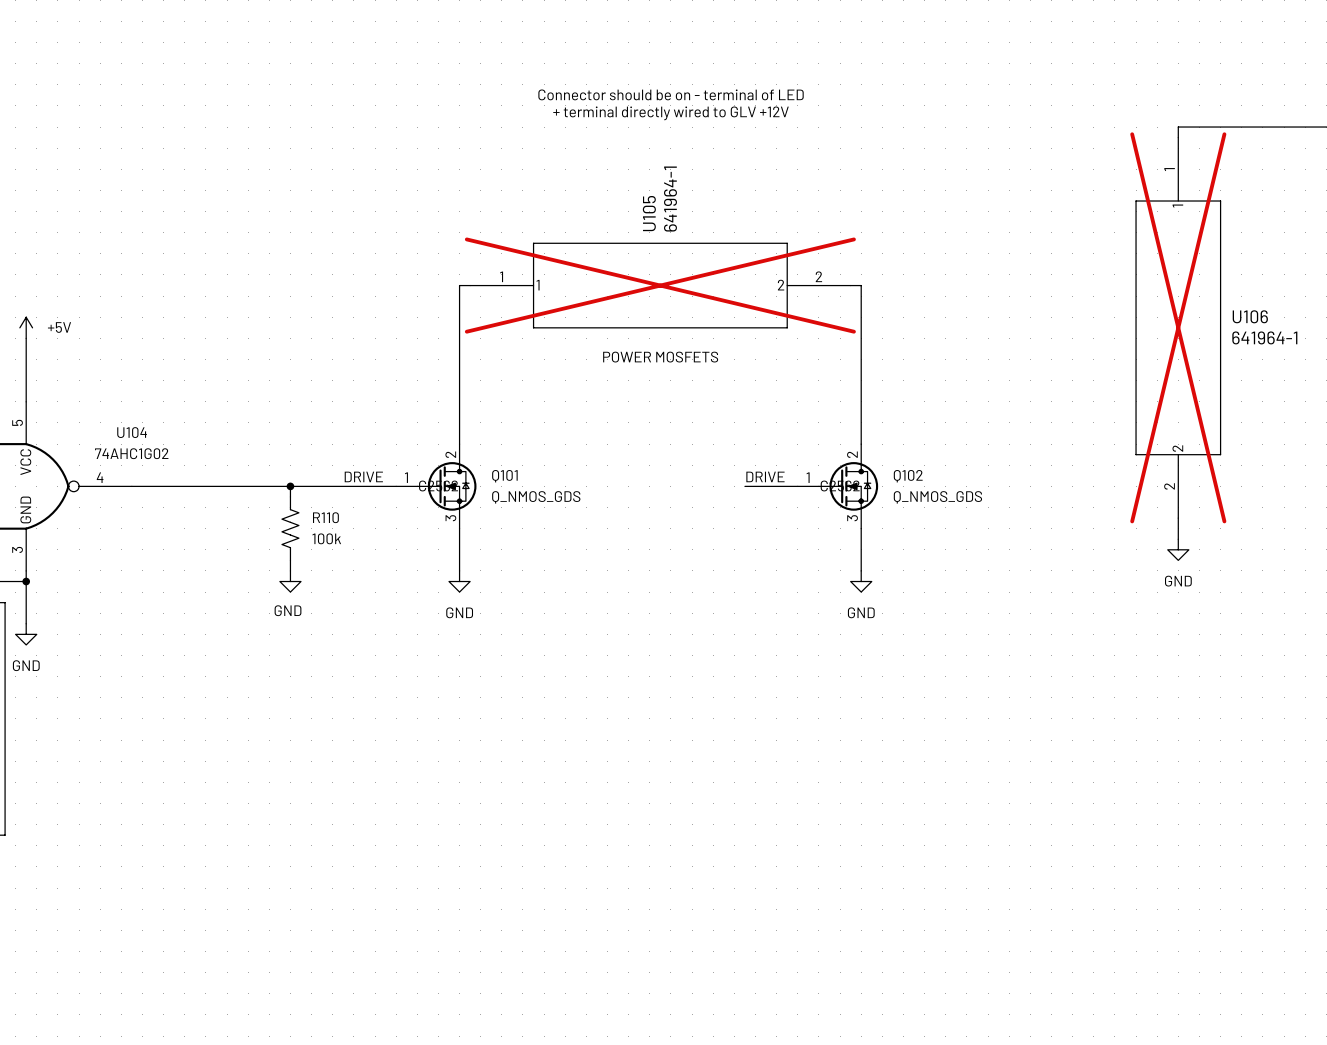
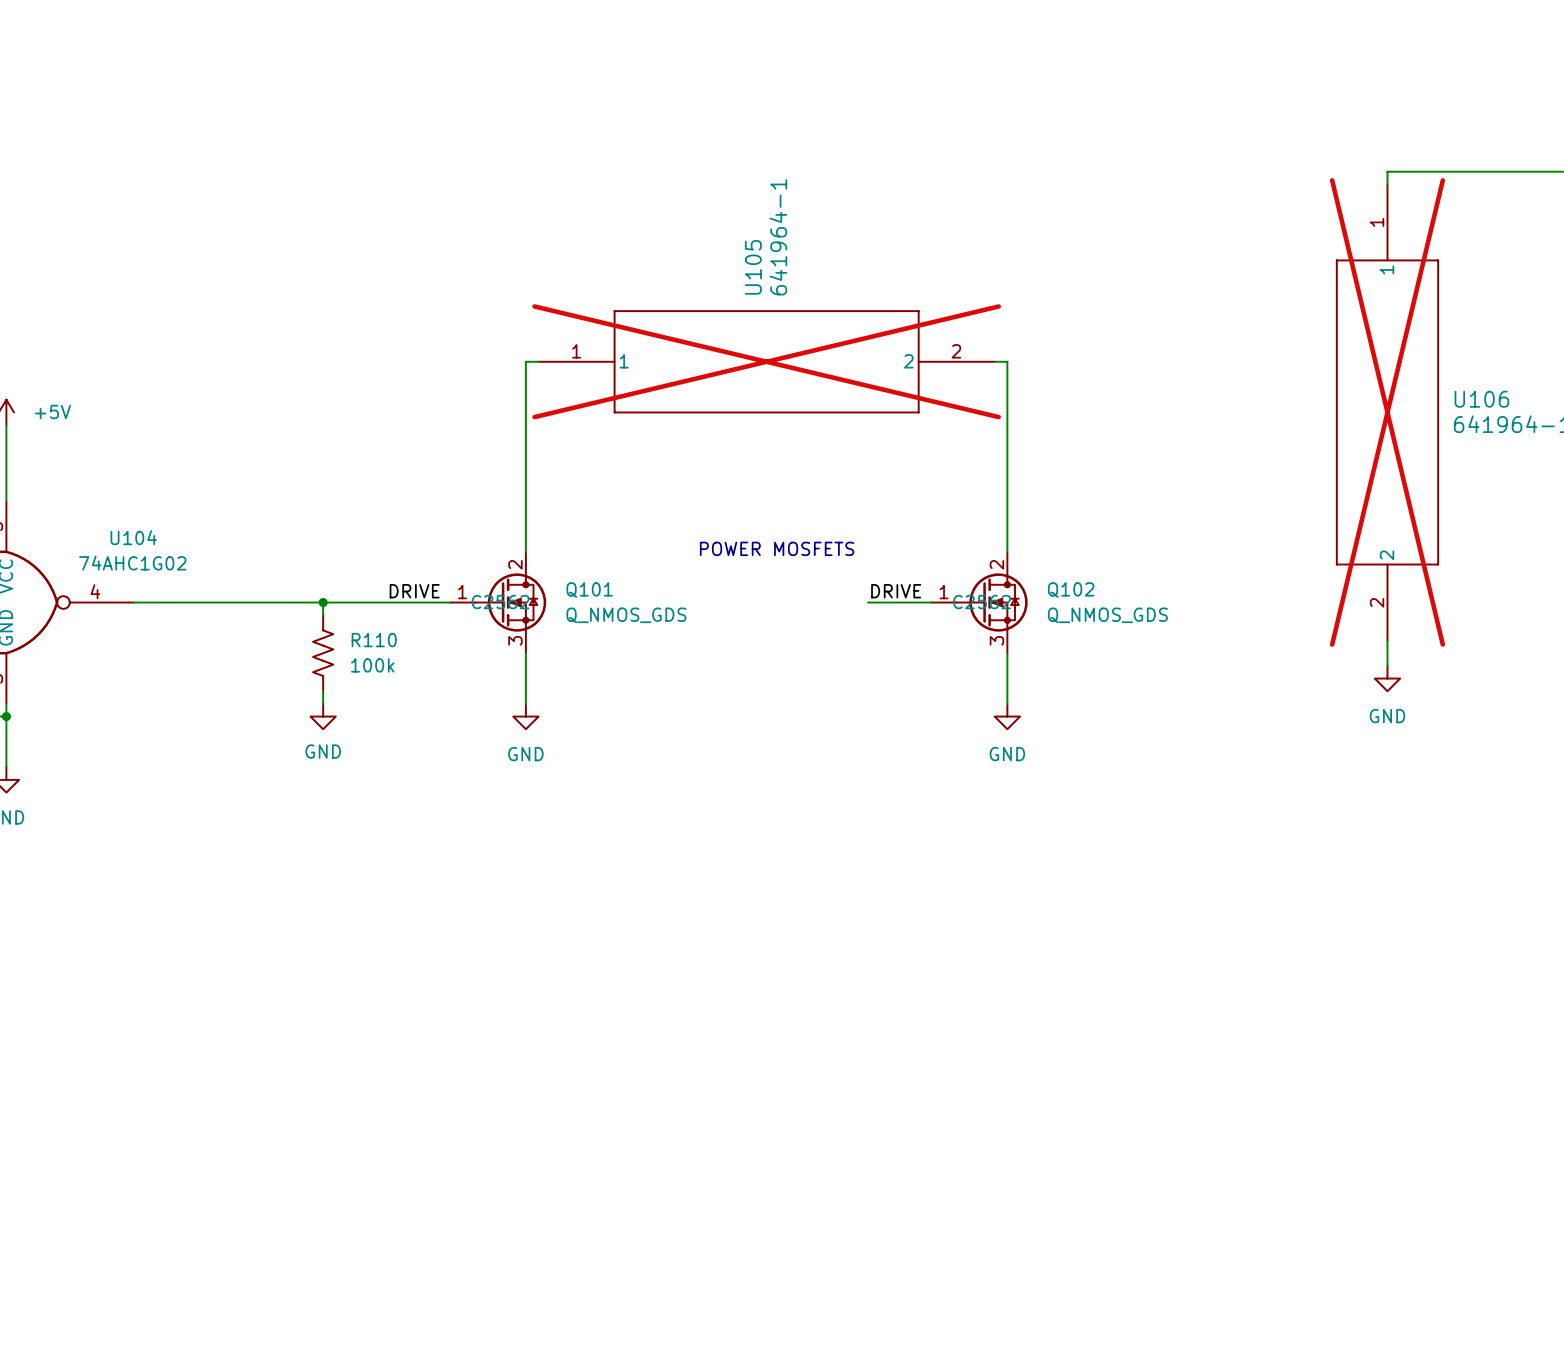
text: Connector should be on - terminal of LED (671, 94) -> none
text: + terminal directly wired to GLV +12V (671, 113) -> none
text position: POWER MOSFETS (660, 357) -> POWER MOSFETS (777, 548)

